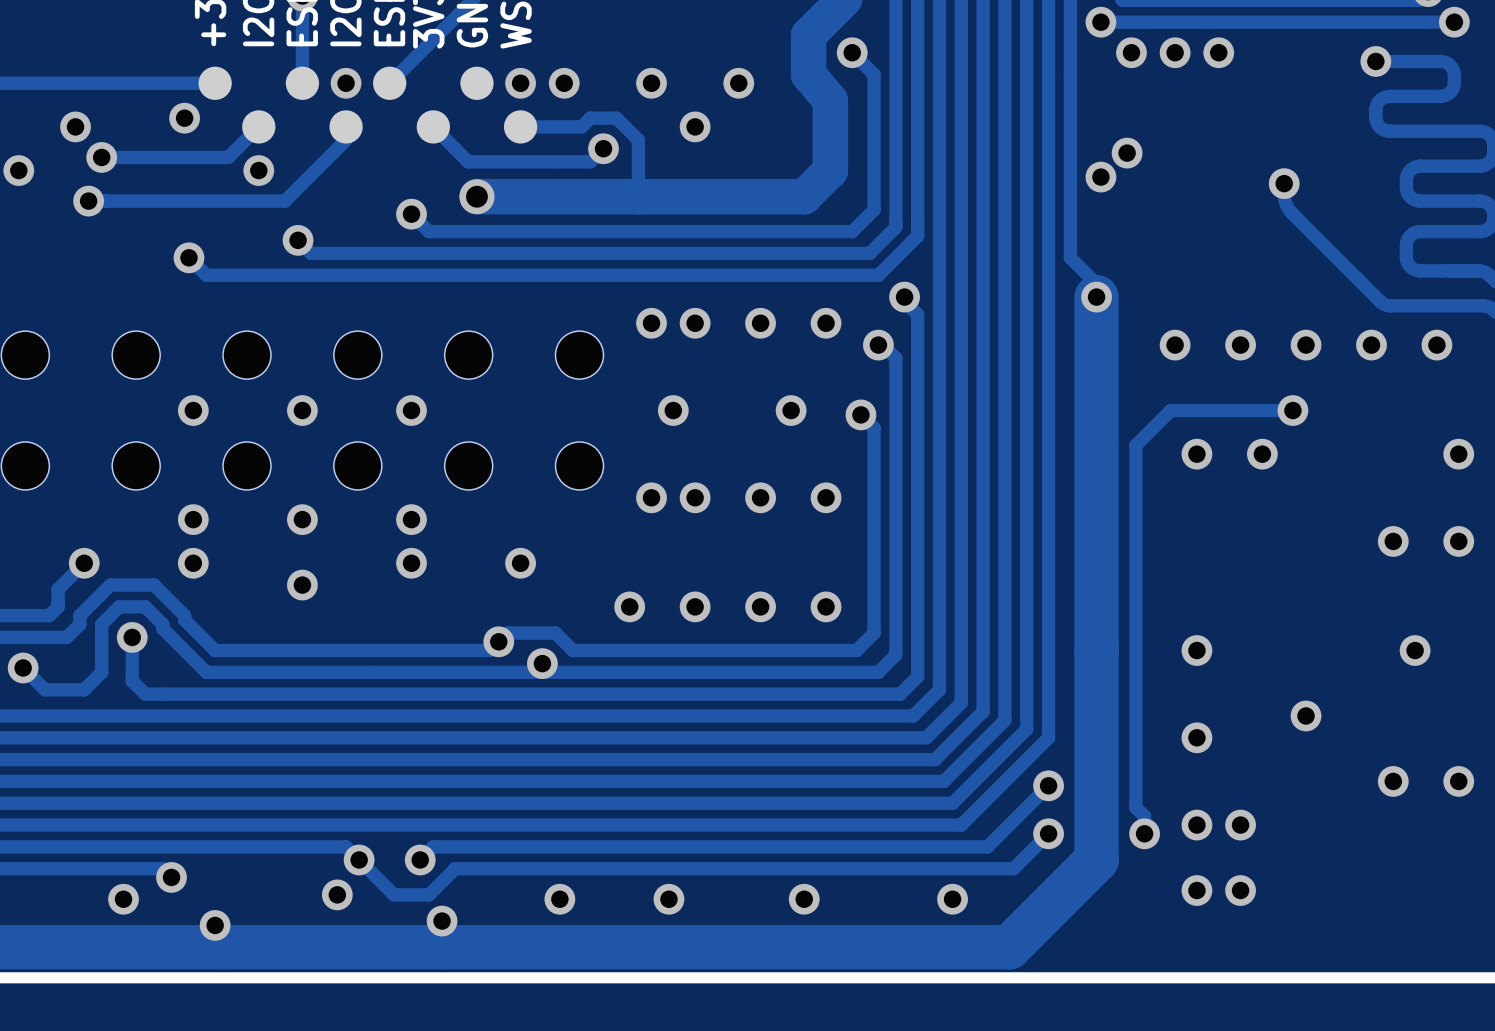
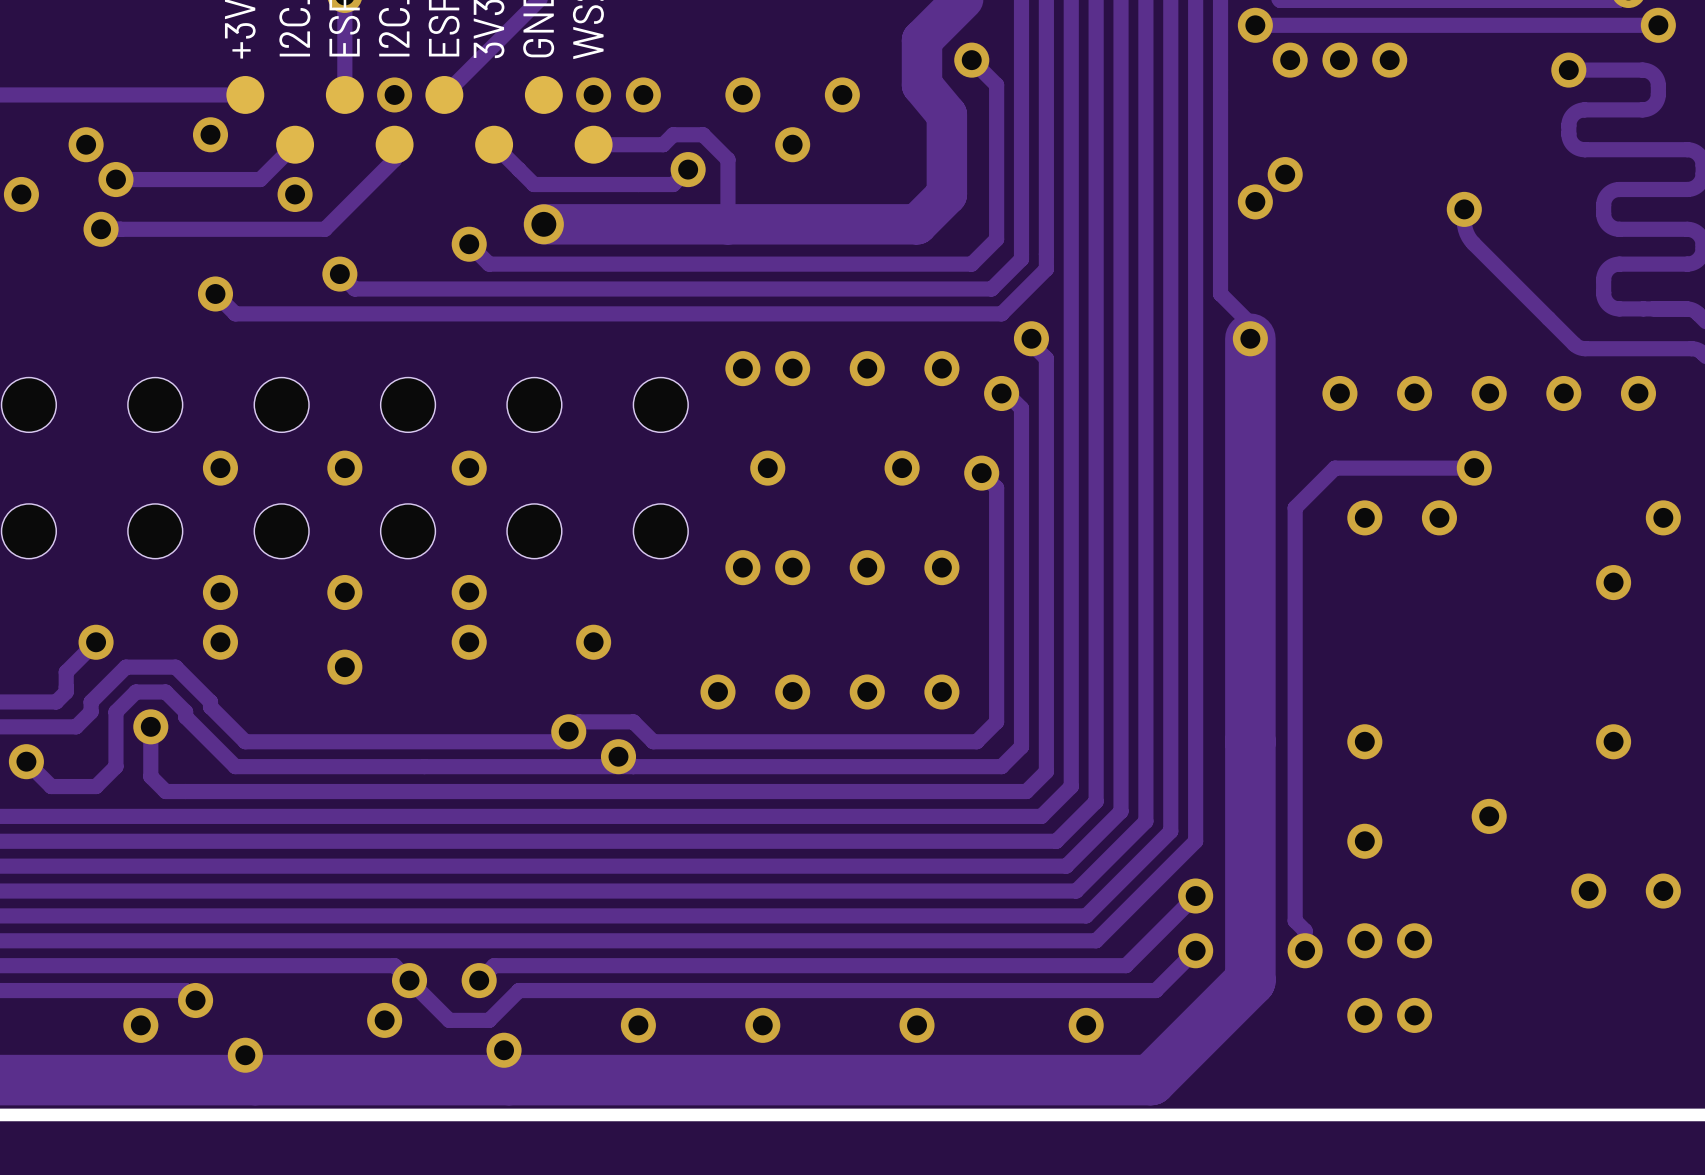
via position: (1393, 541) -> (1613, 582)
via: (1458, 541) -> none

